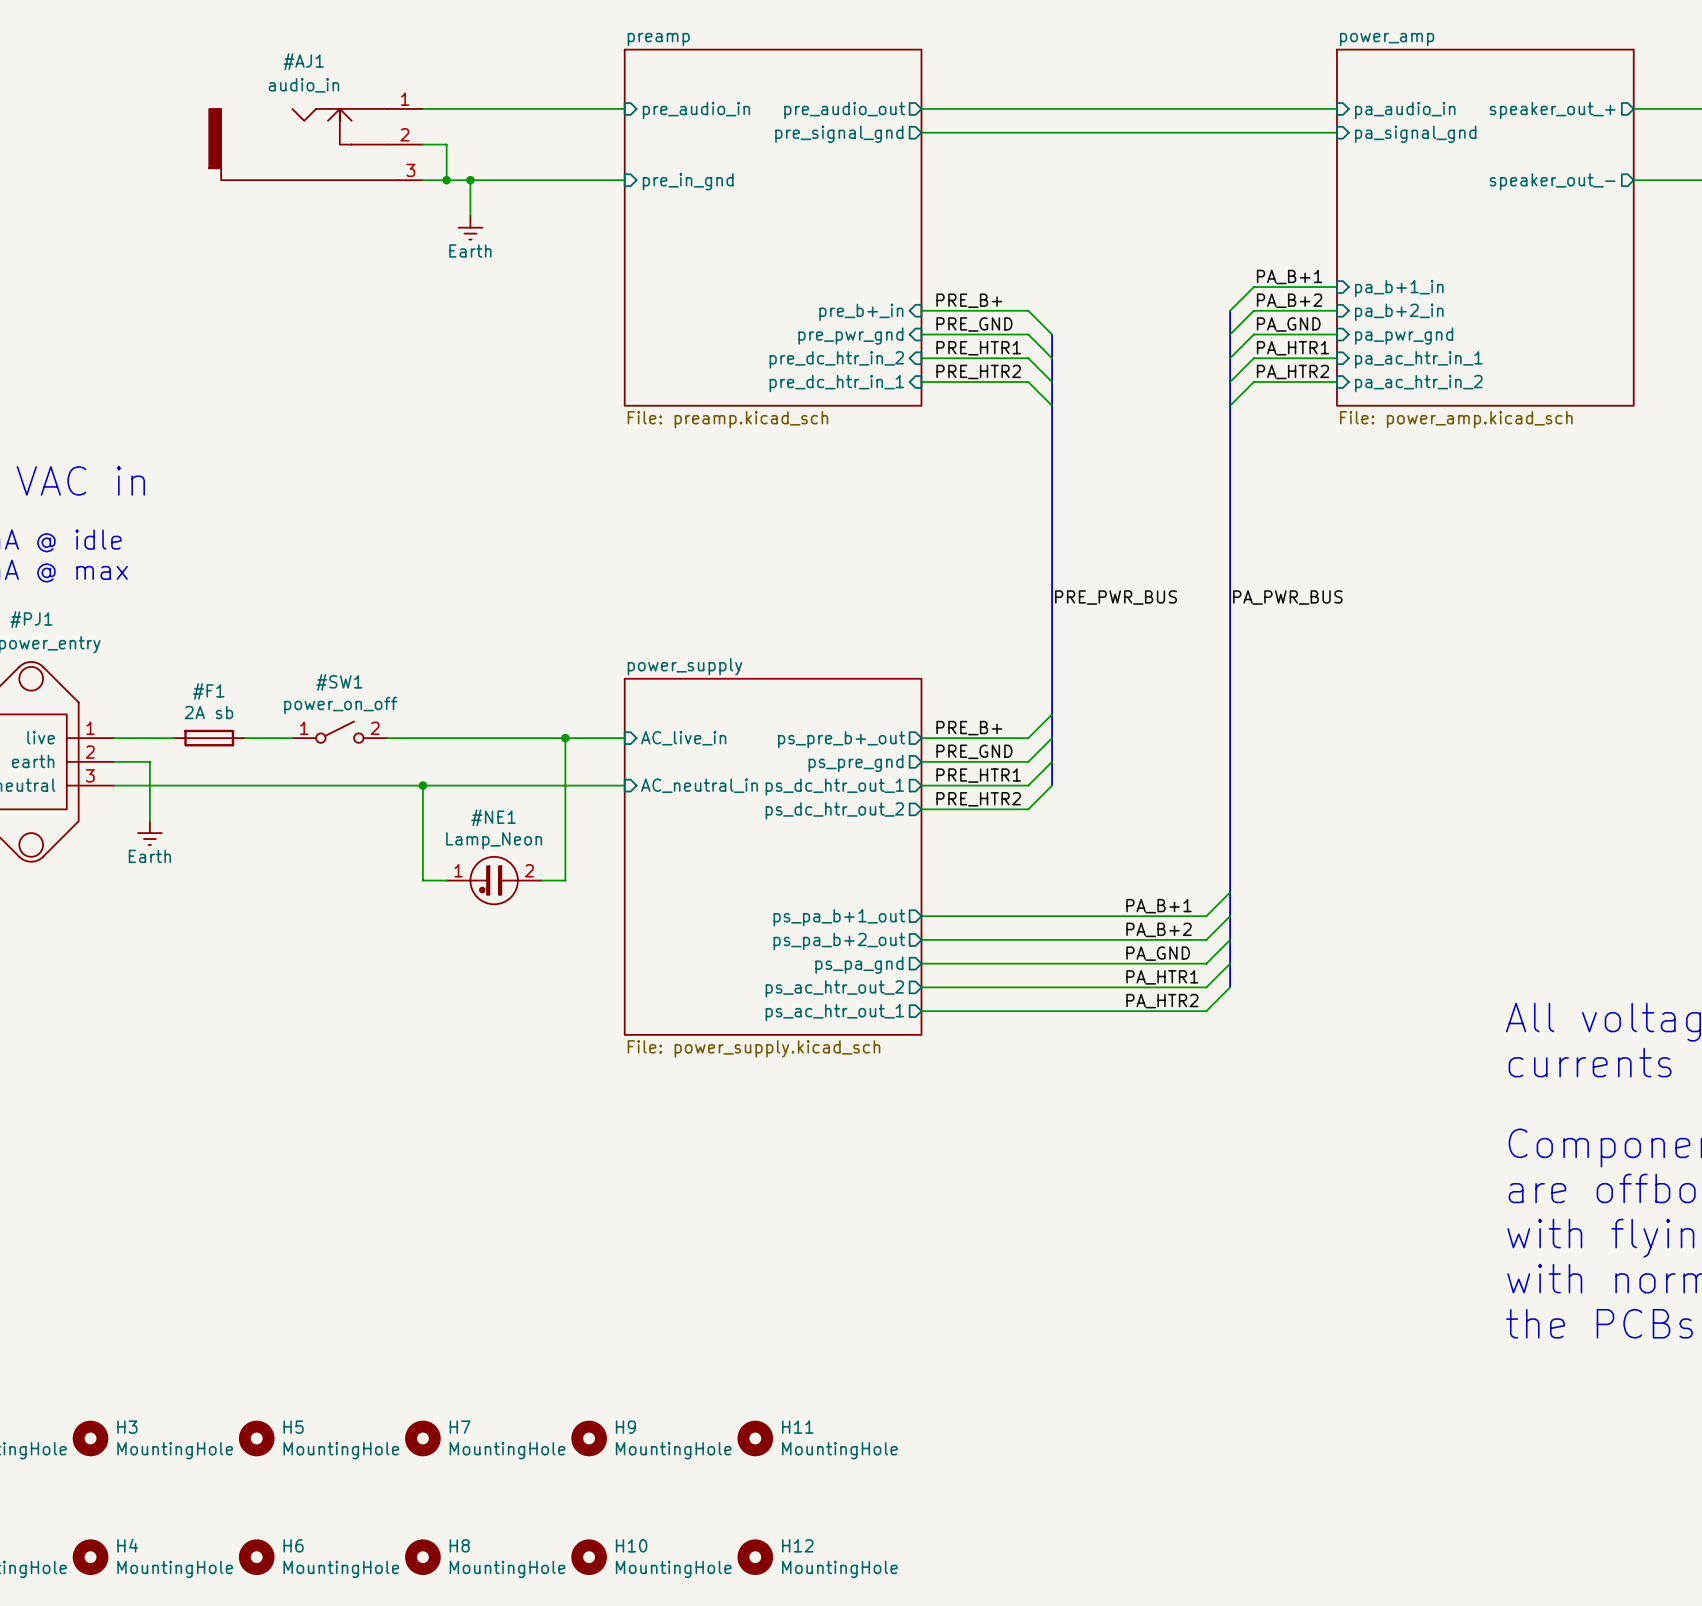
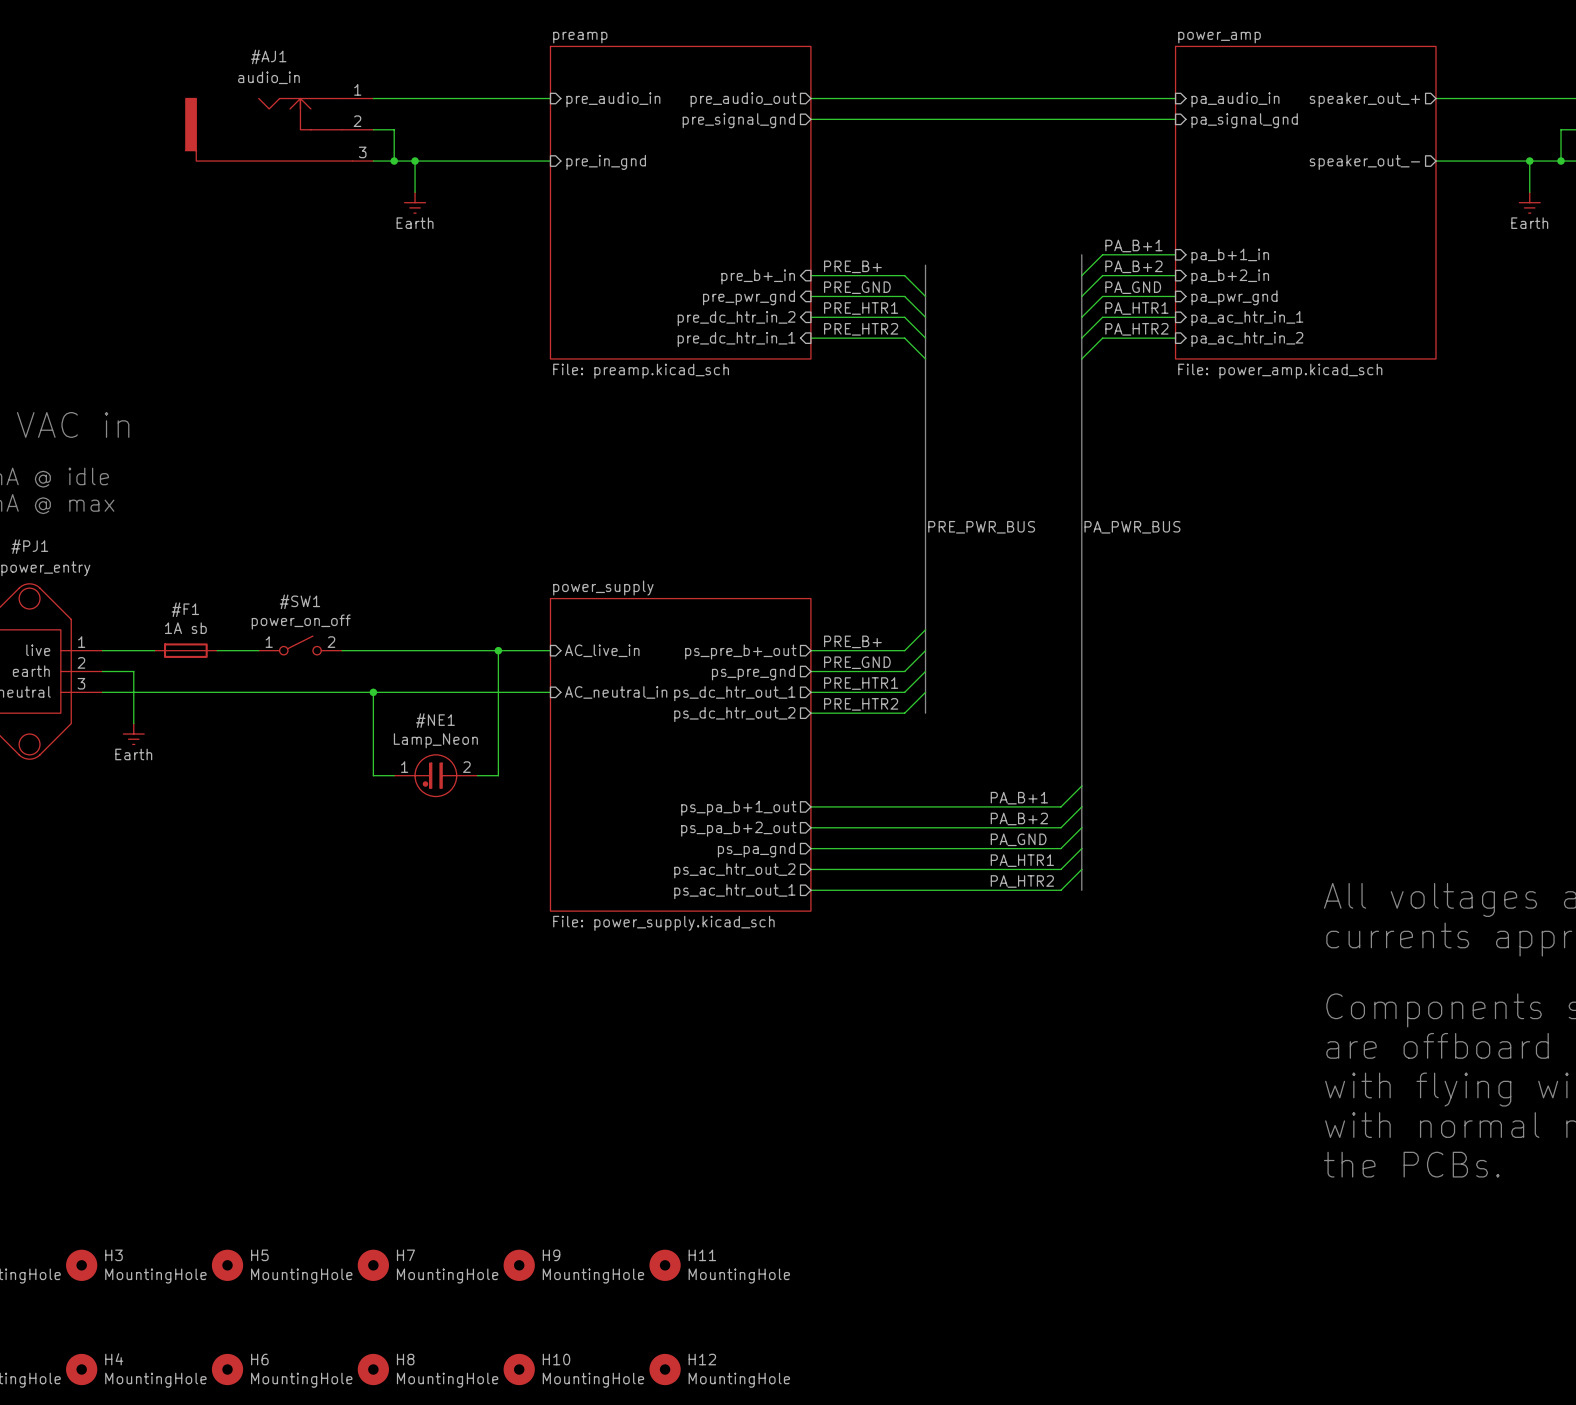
bus: none -> (1081, 254) (1081, 275)
bus: none -> (925, 265) (925, 296)
power symbol: 2A sb (209, 738) -> 1A sb (185, 650)
bus: none -> (925, 692) (925, 713)
bus: none -> (1081, 869) (1081, 890)

